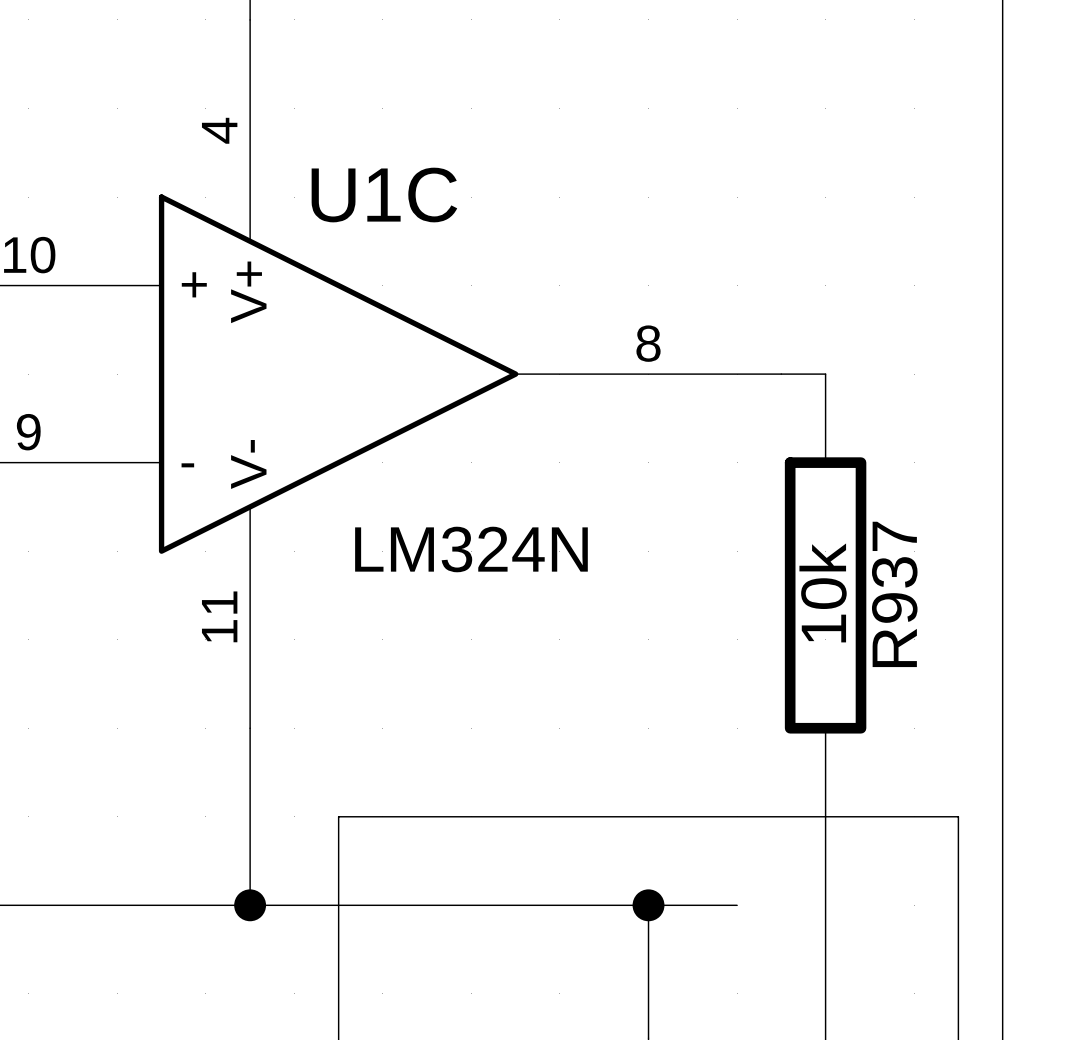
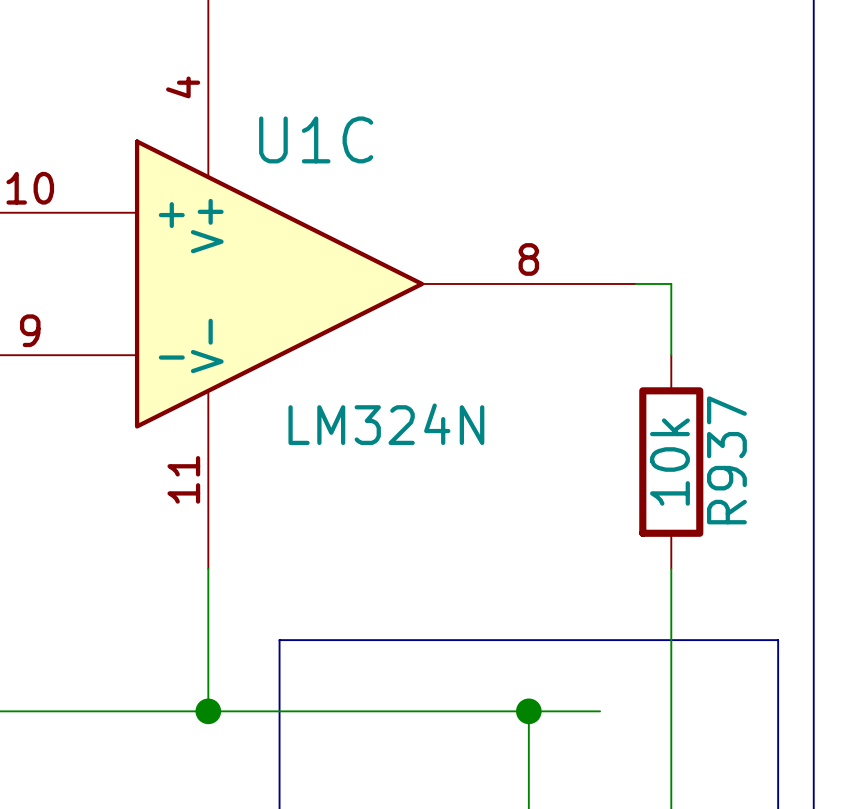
R937 symbol: [784, 374, 867, 817] -> [639, 355, 704, 569]

